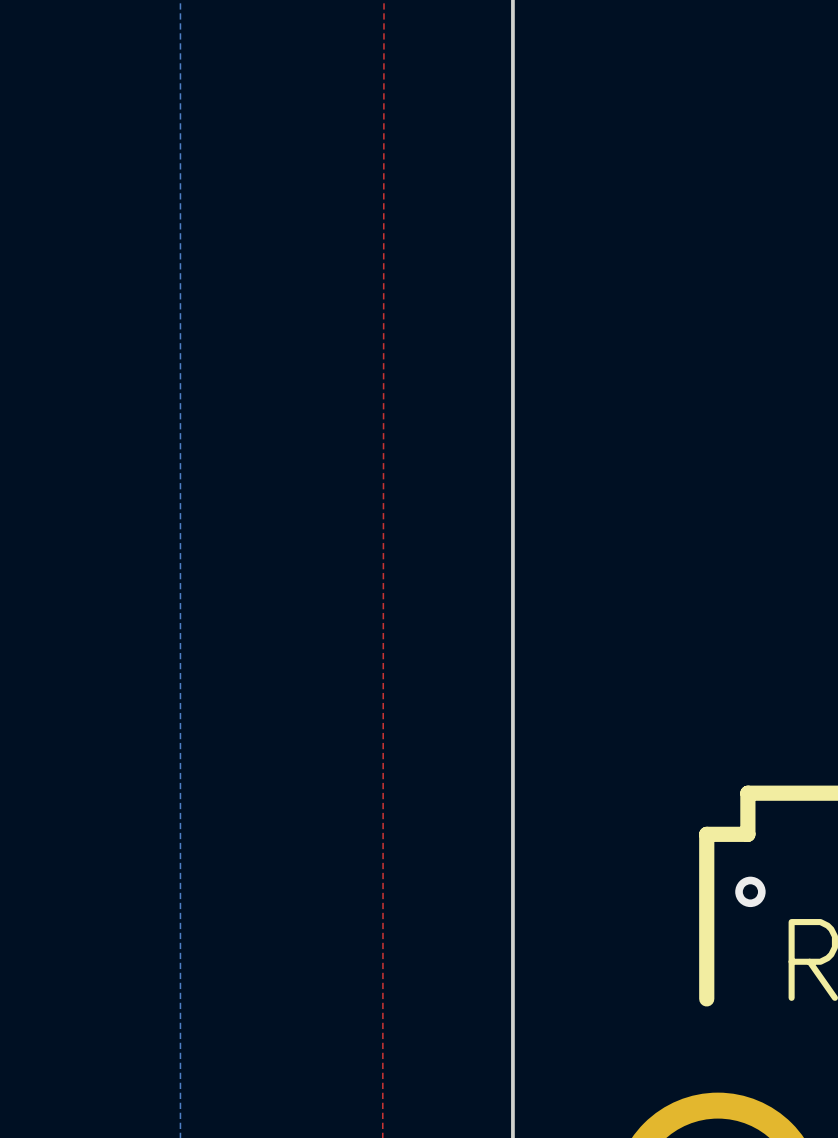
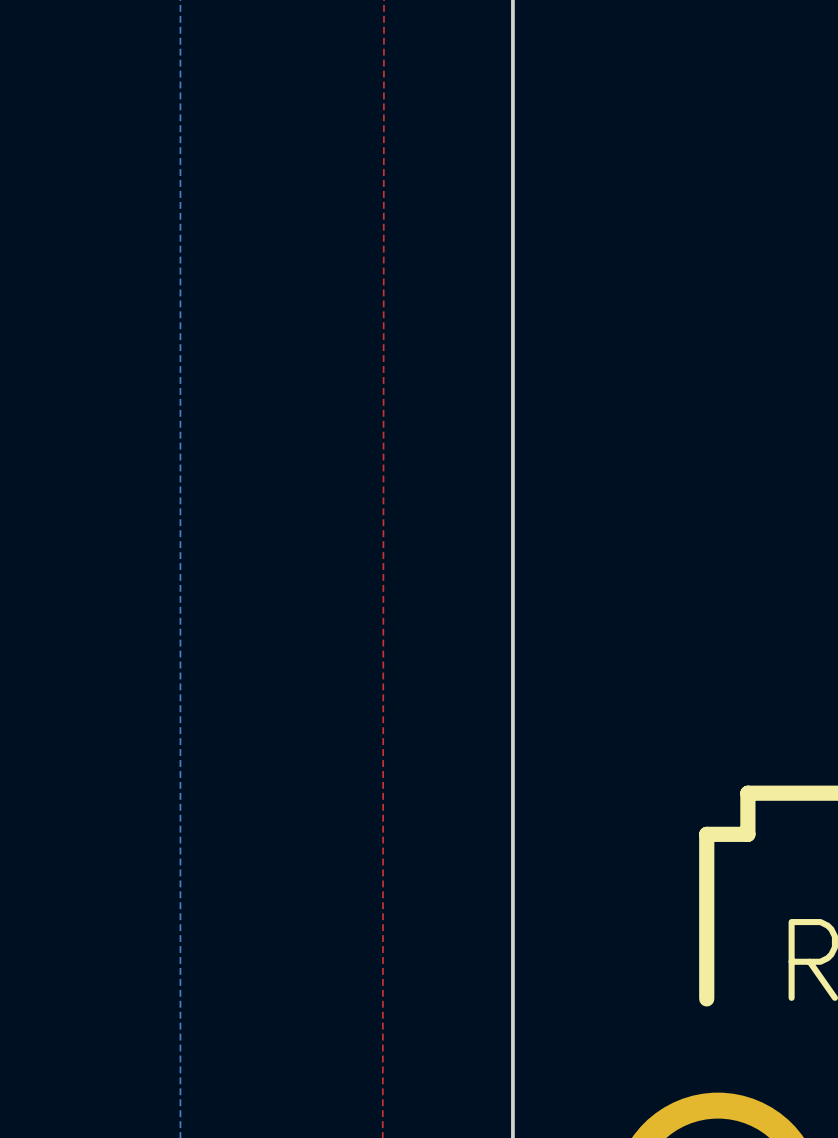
via: (750, 891) -> none

